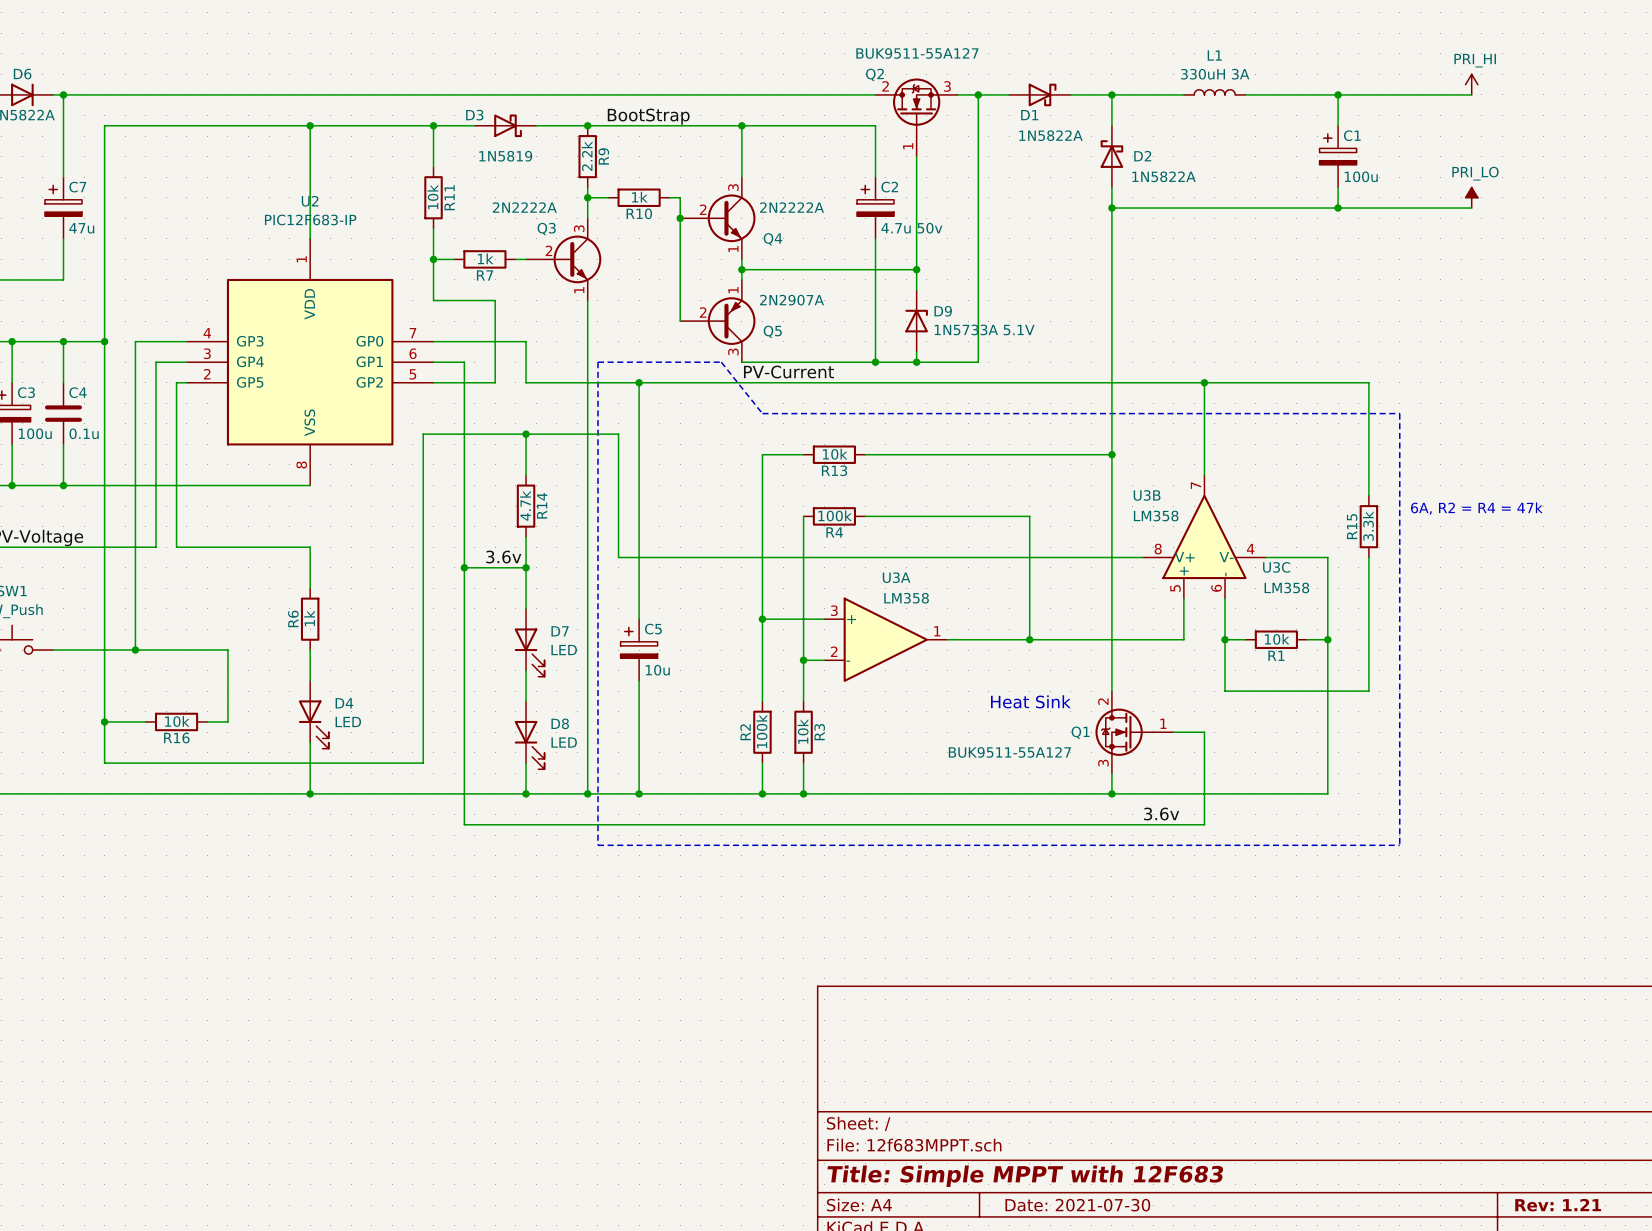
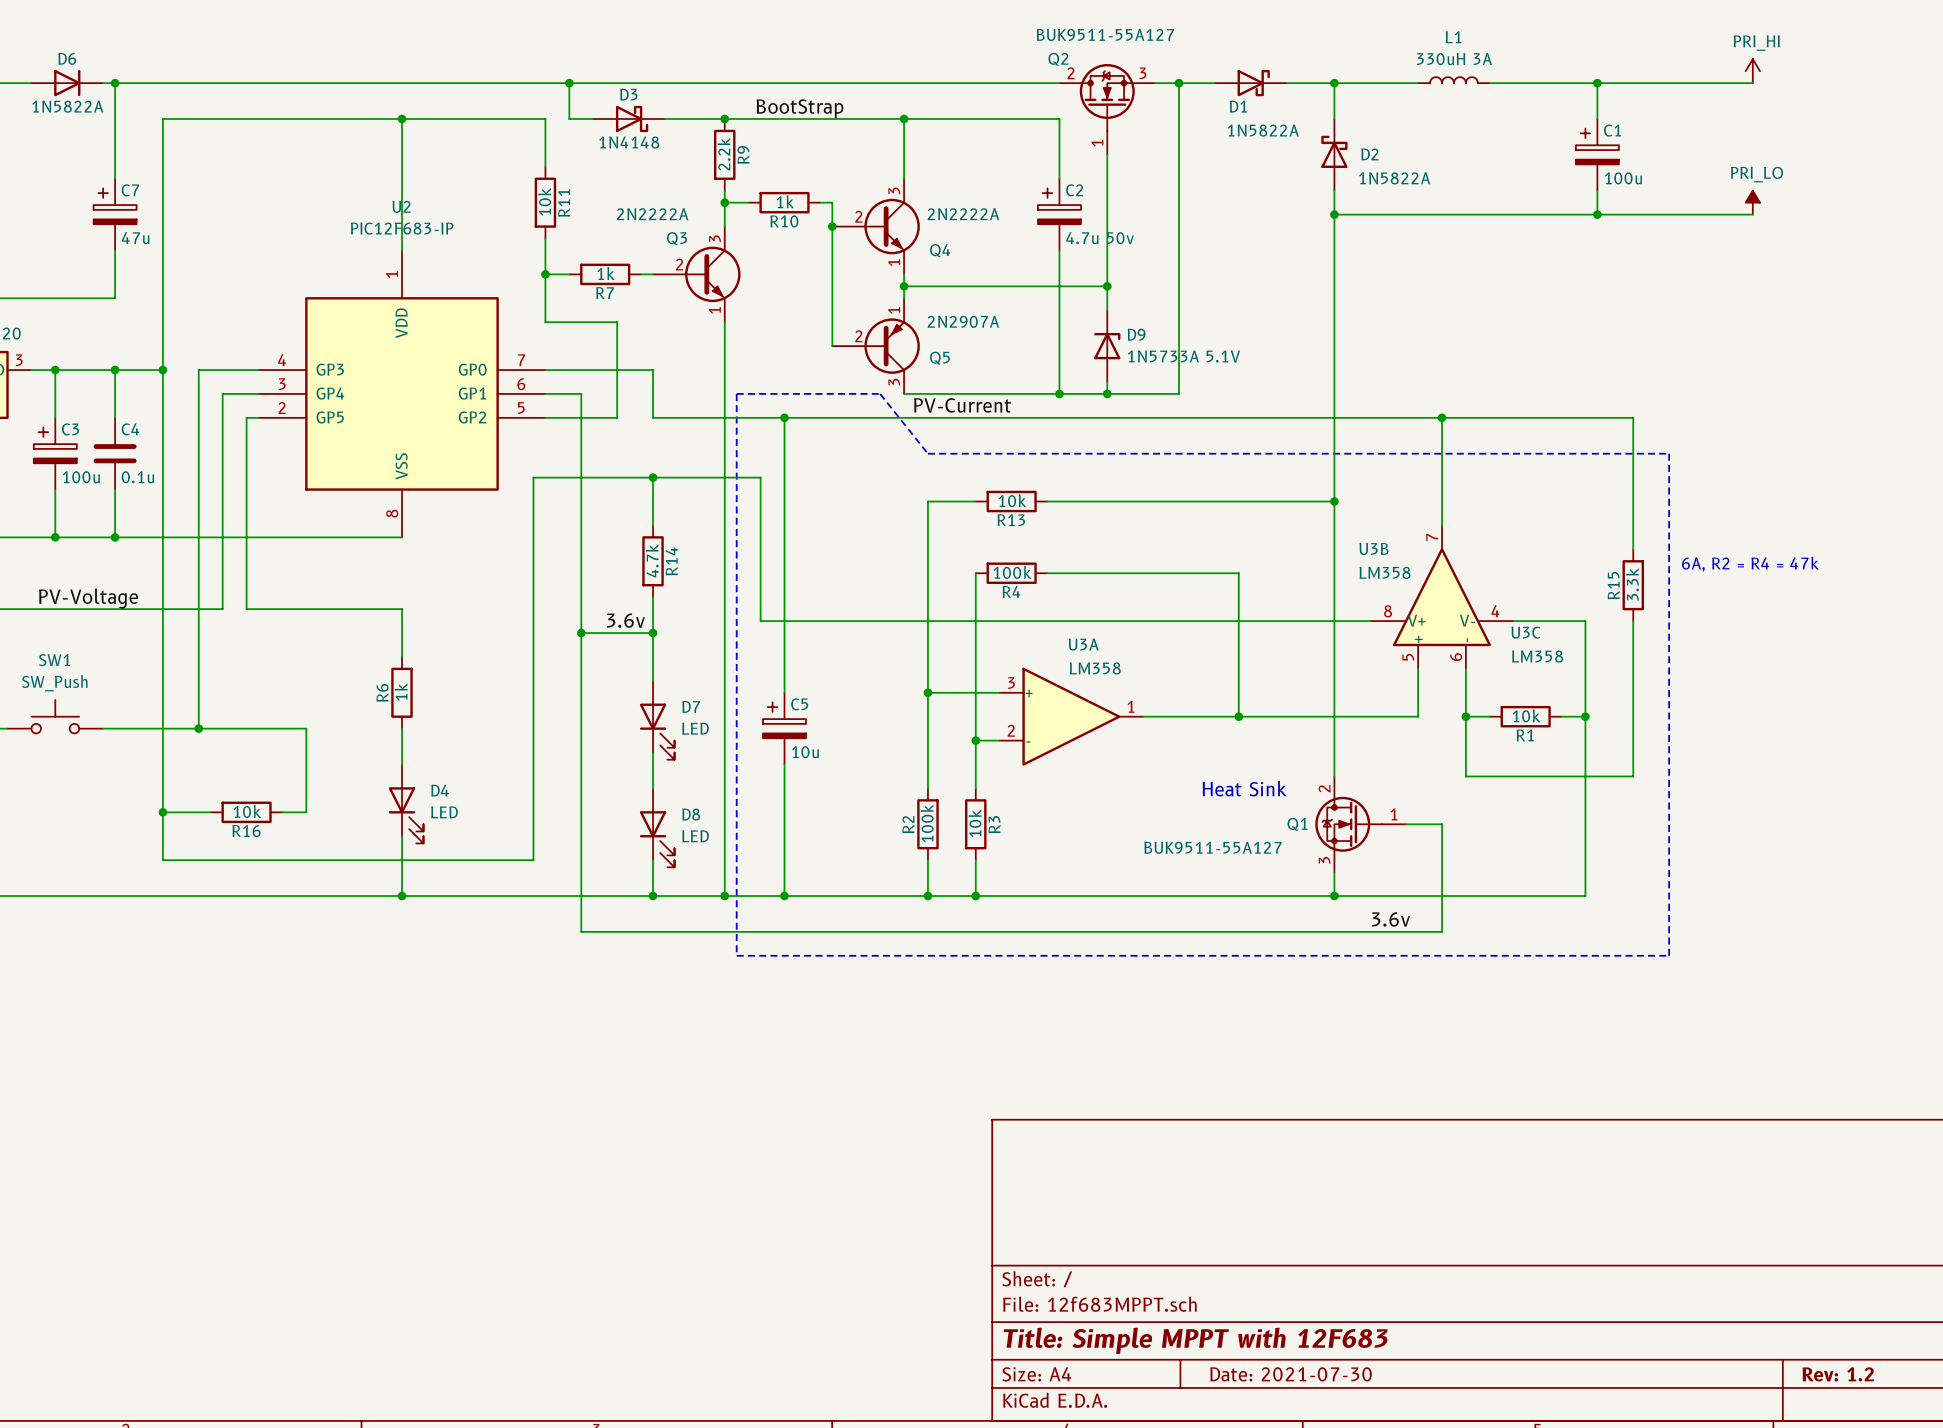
D3 name position: D3 (474, 115) -> D3 (628, 94)
wire: (433, 125) (454, 125) -> (569, 83) (569, 118)
junction position: (433, 125) -> (569, 83)
D3 value: 1N5819 (505, 156) -> 1N4148 (629, 142)
title block: Rev: 1.21 (1558, 1205) -> Rev: 1.2 (1838, 1374)

